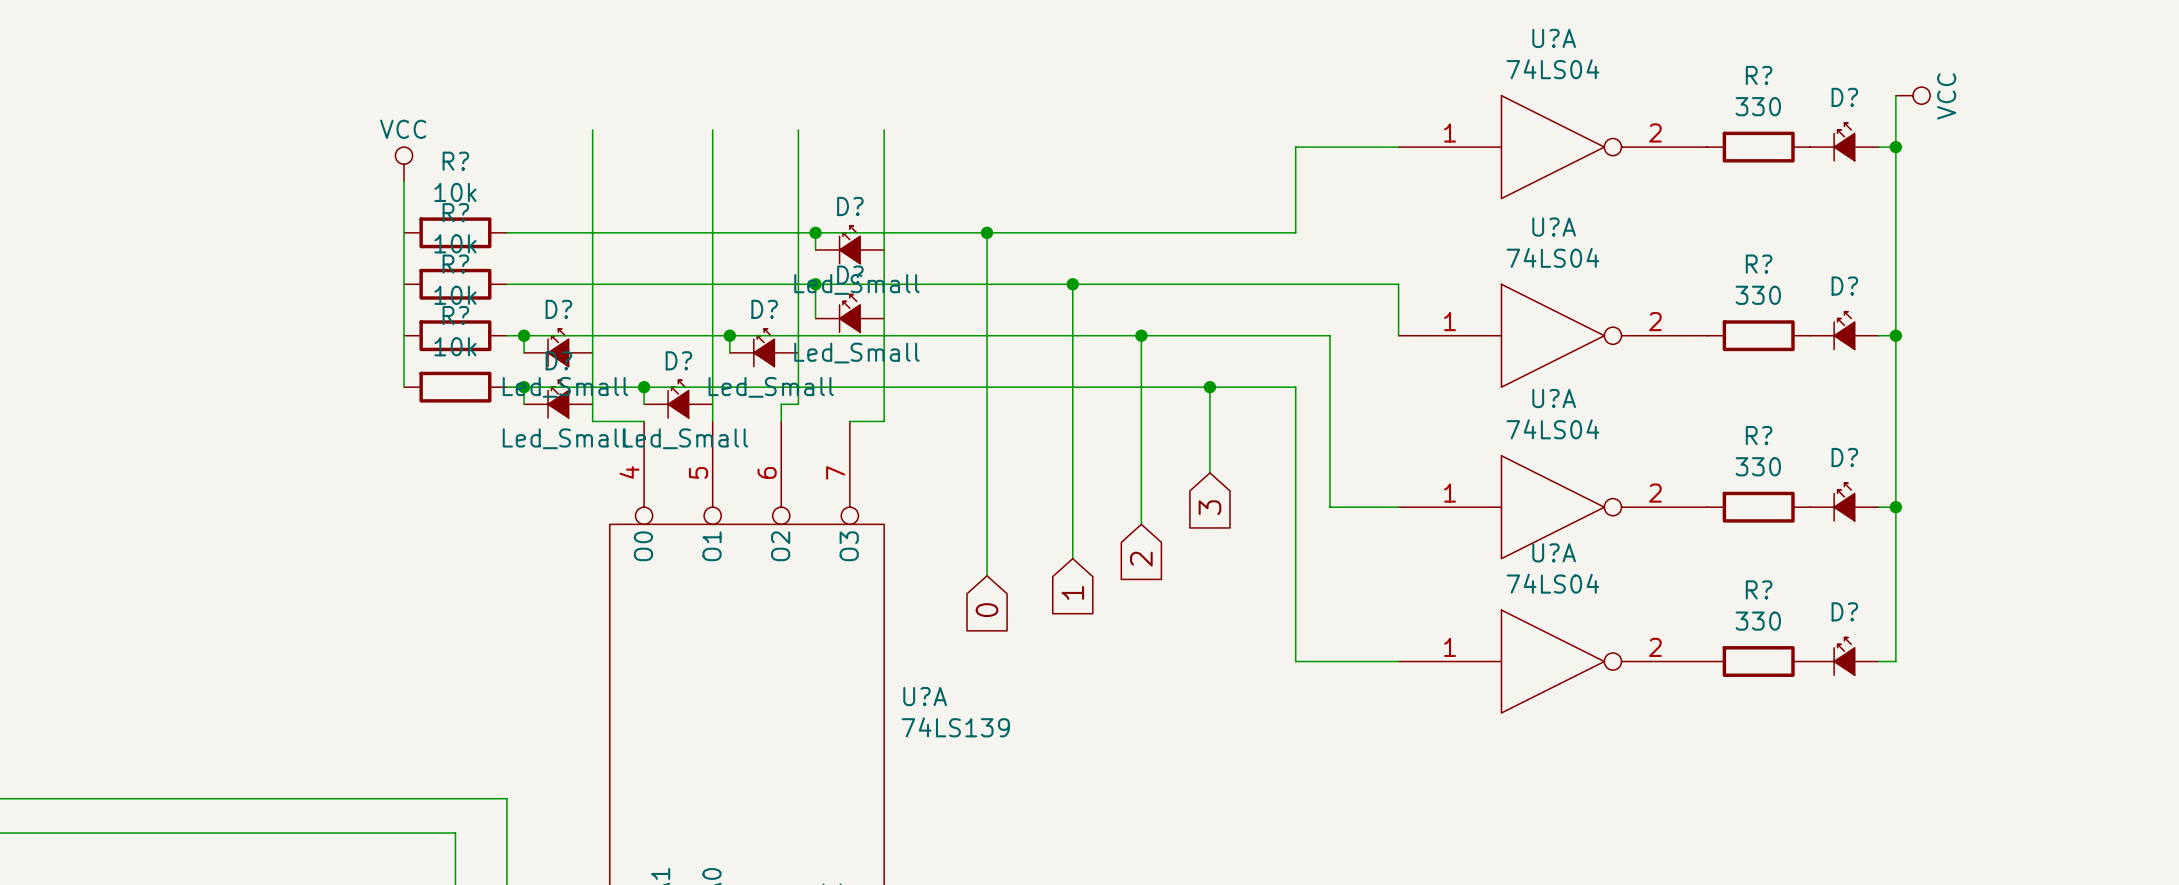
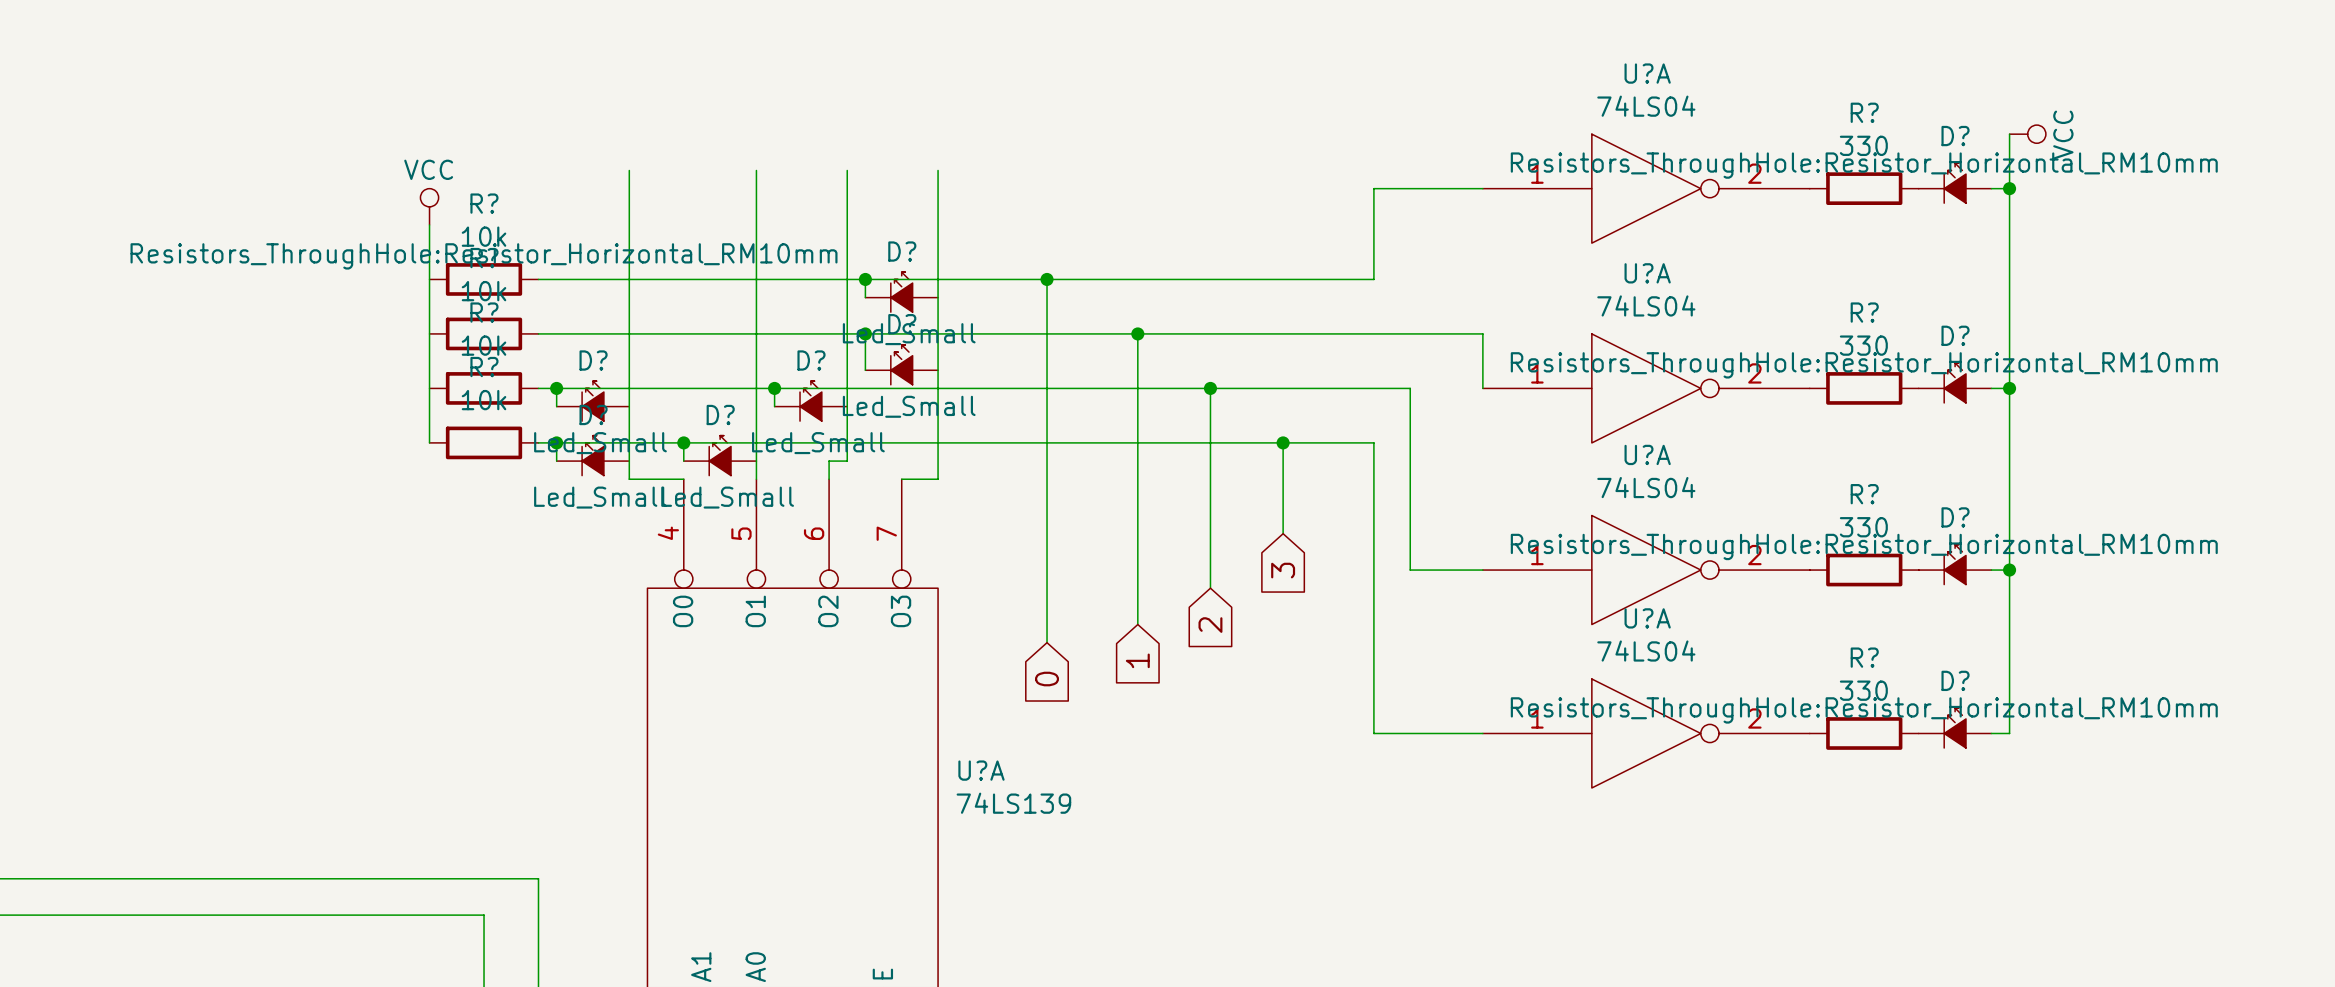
R? text: none -> Resistors_ThroughHole:Resistor_Horizontal_RM10mm (1864, 165)
R? text: none -> Resistors_ThroughHole:Resistor_Horizontal_RM10mm (484, 256)
R? text: none -> Resistors_ThroughHole:Resistor_Horizontal_RM10mm (1864, 365)
R? text: none -> Resistors_ThroughHole:Resistor_Horizontal_RM10mm (1864, 546)
R? text: none -> Resistors_ThroughHole:Resistor_Horizontal_RM10mm (1864, 710)

